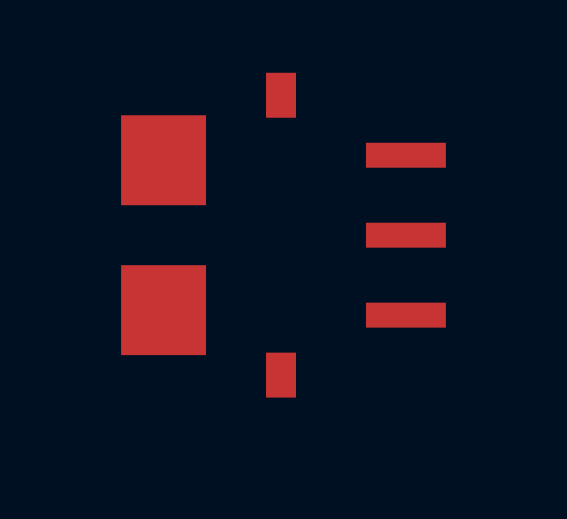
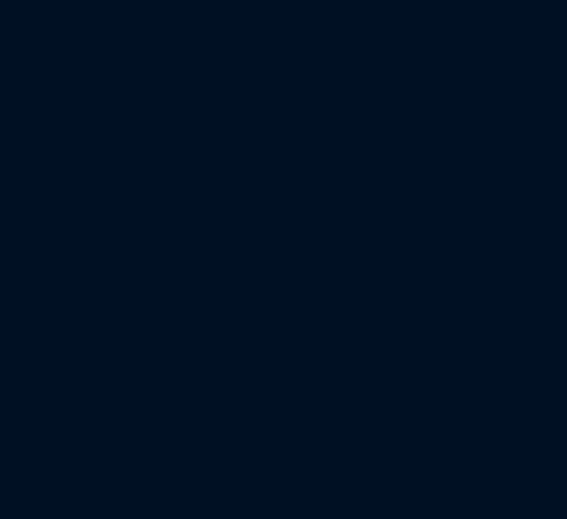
part: (283, 235) -> none

